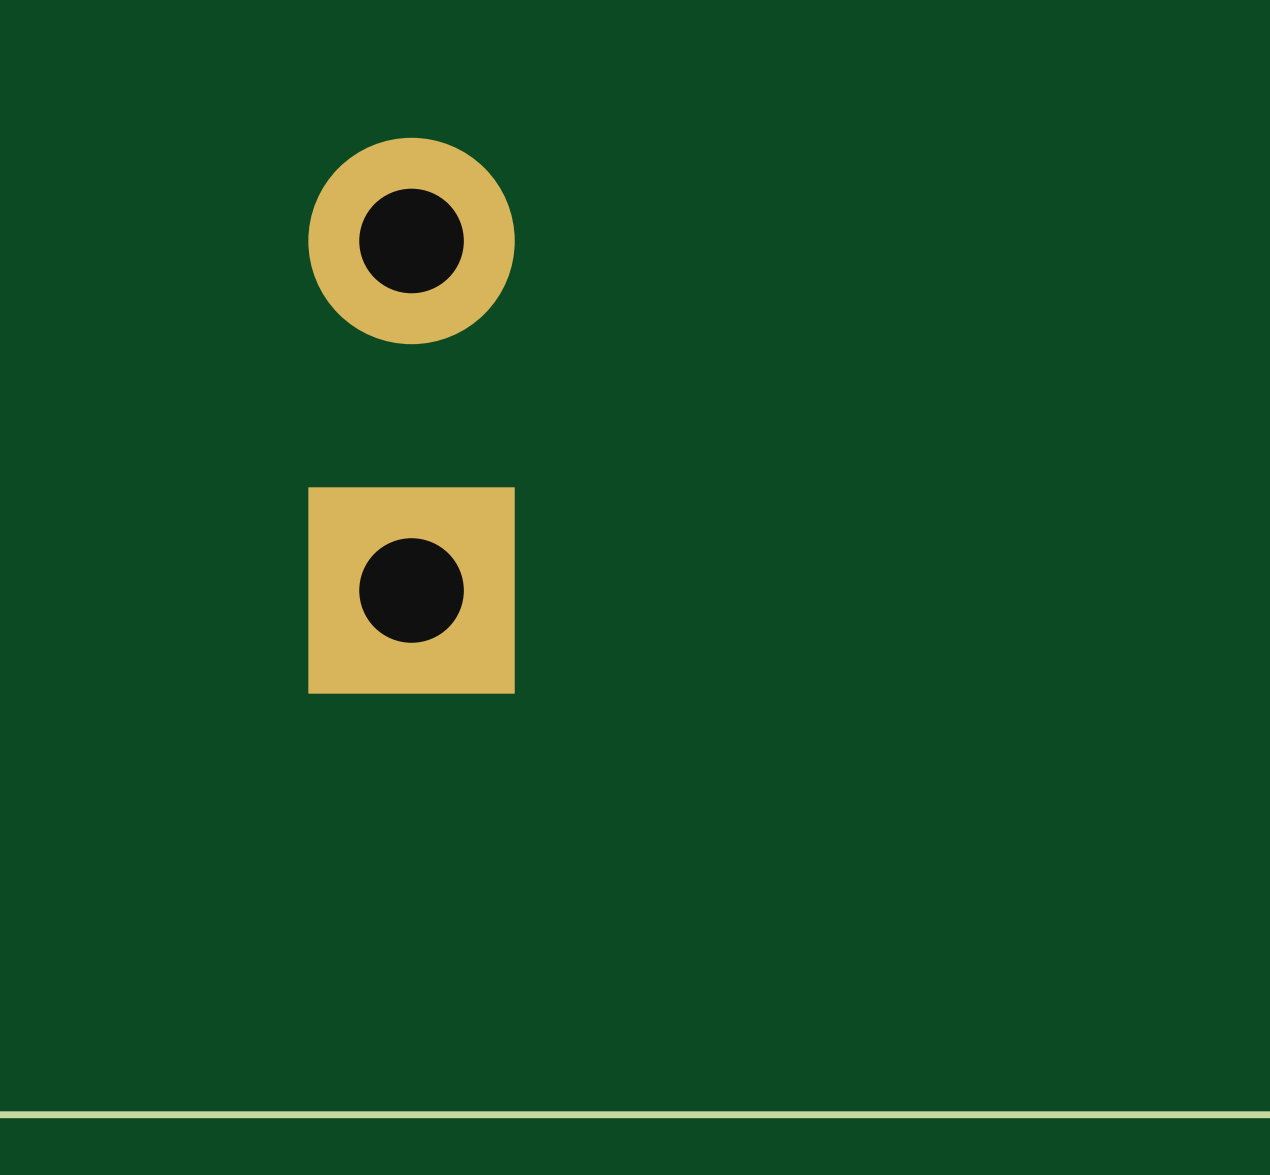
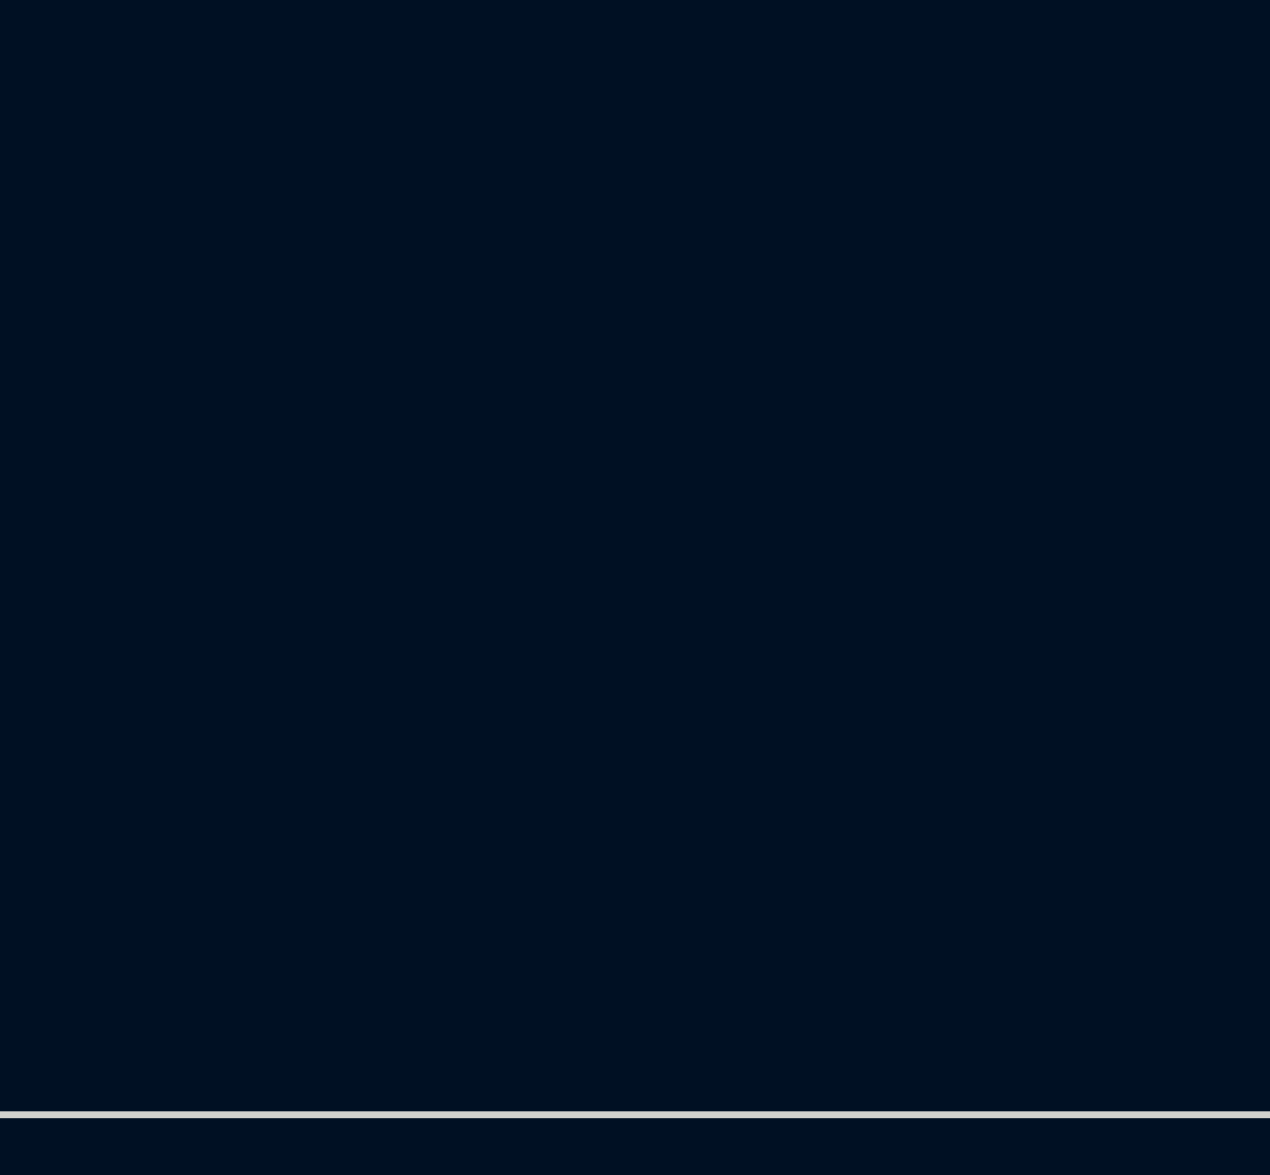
part: (411, 415) -> none

